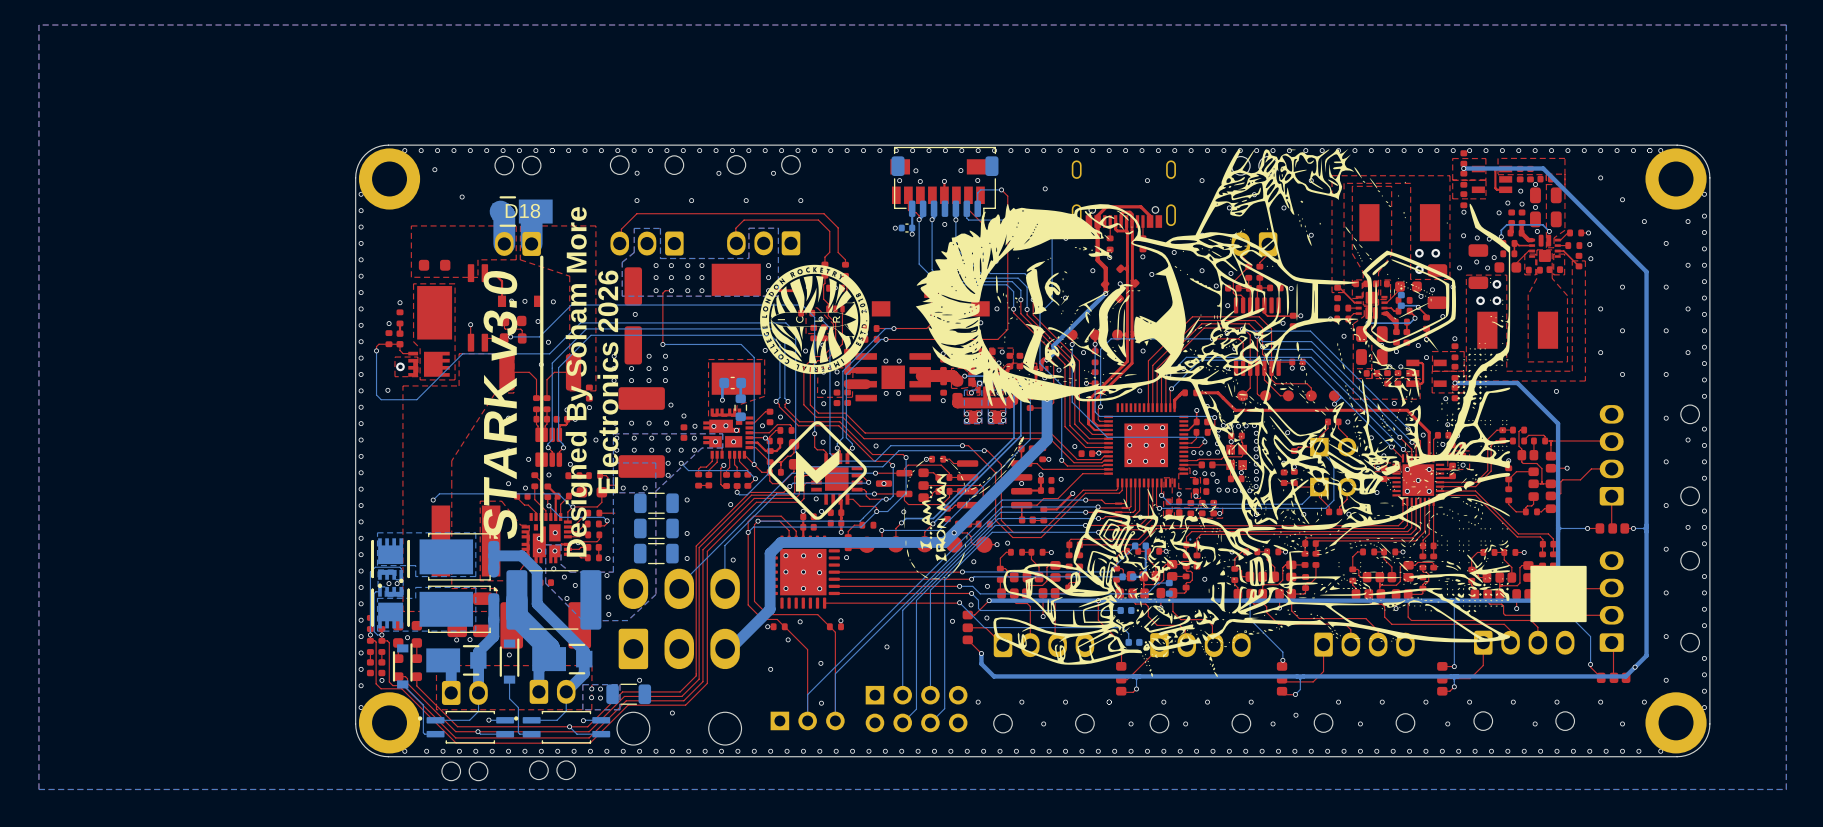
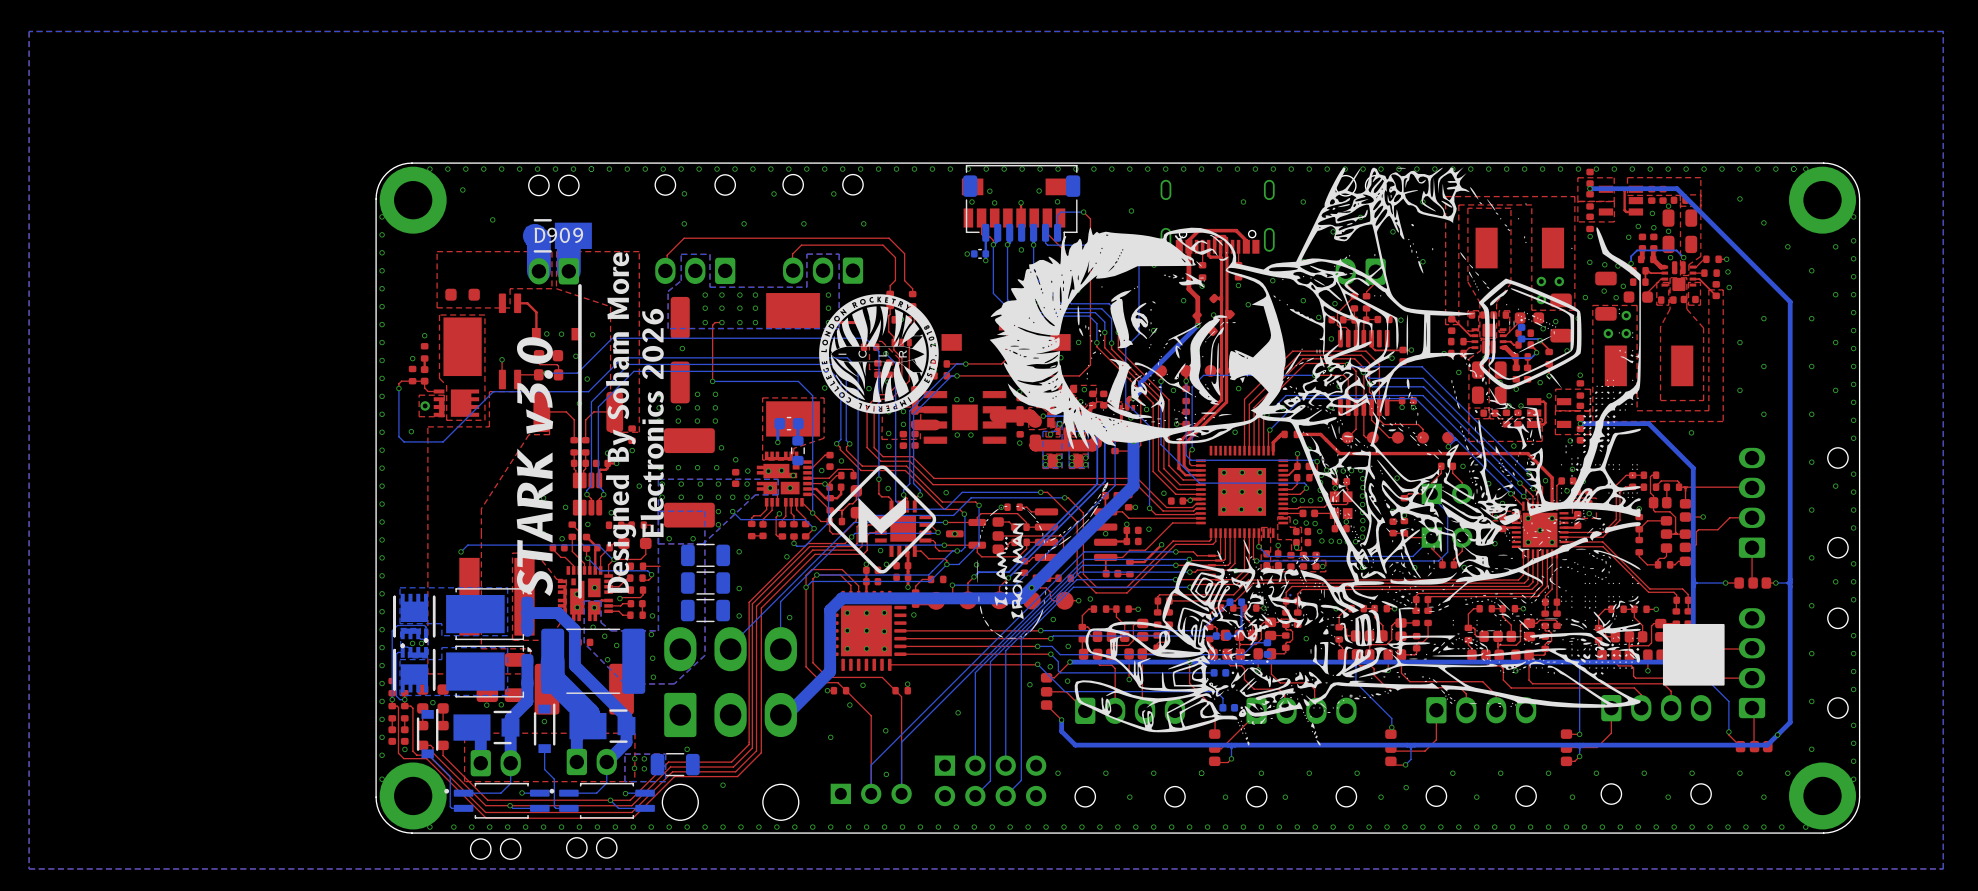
D18 name: D18 (522, 211) -> D909 (558, 235)

